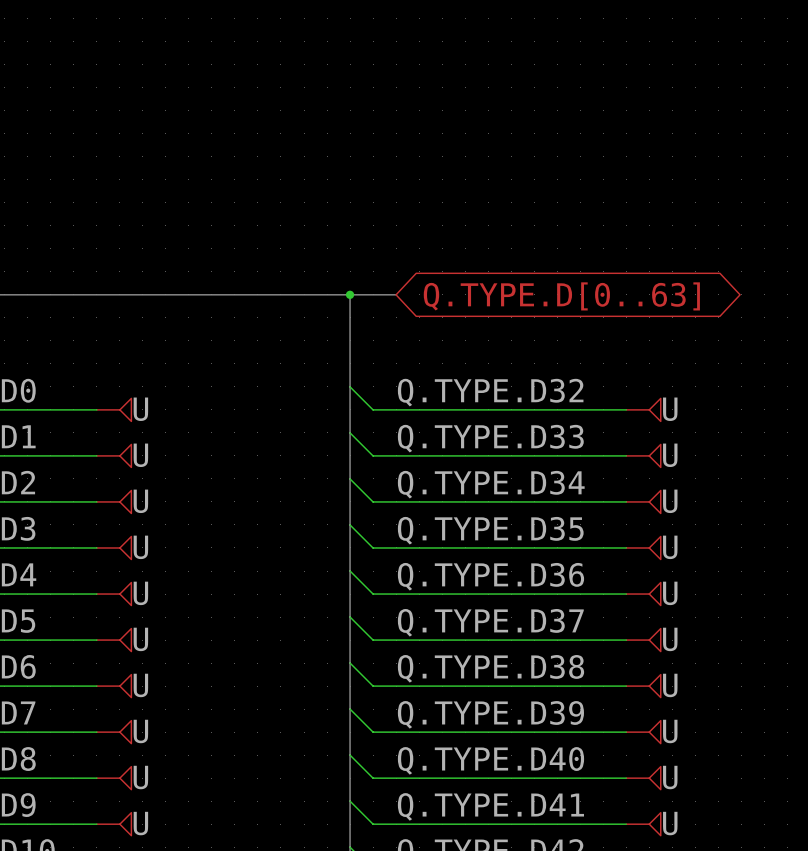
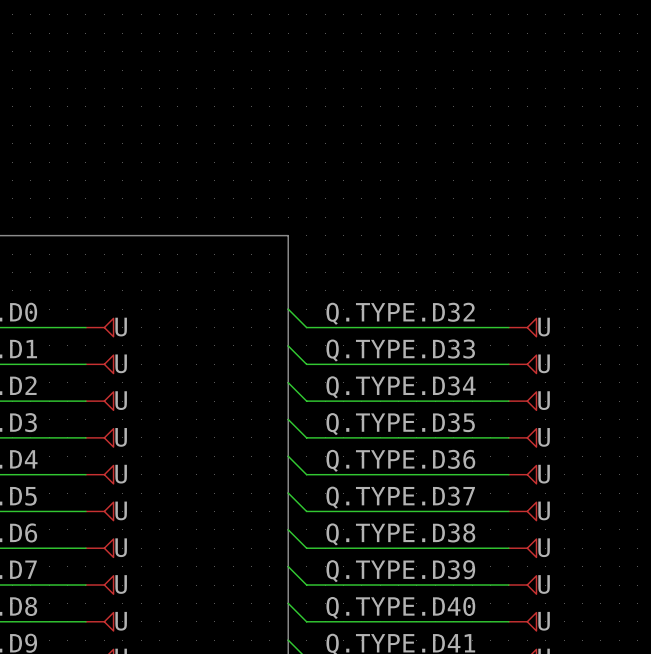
bus: (350, 294) (396, 294) -> none
junction: (350, 294) -> none
global label: Q.TYPE.D[0..63] (561, 296) -> none

